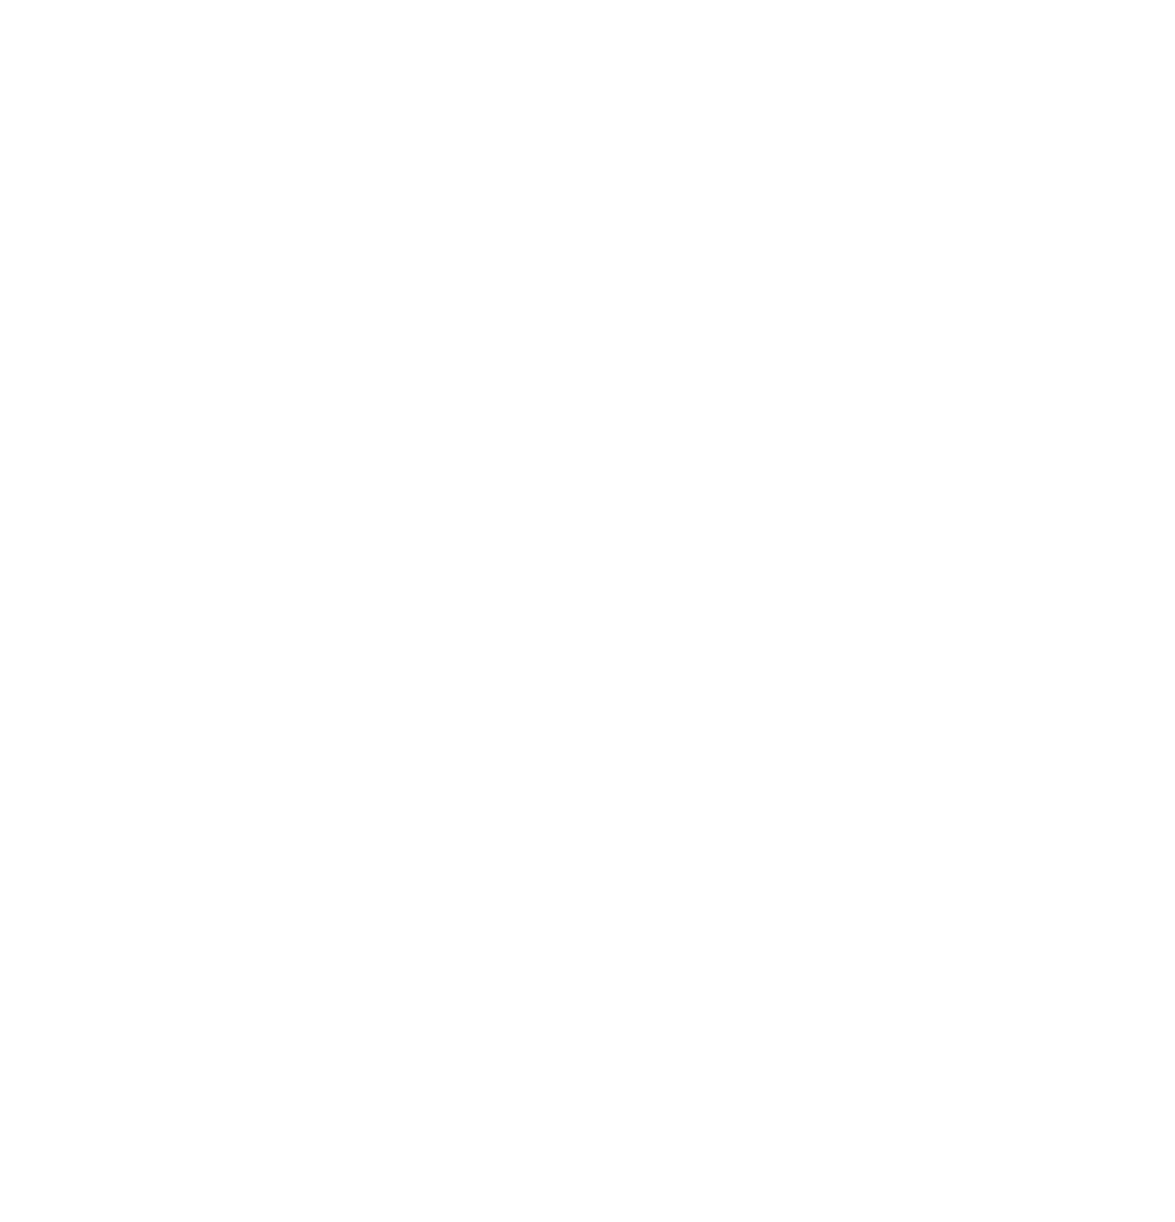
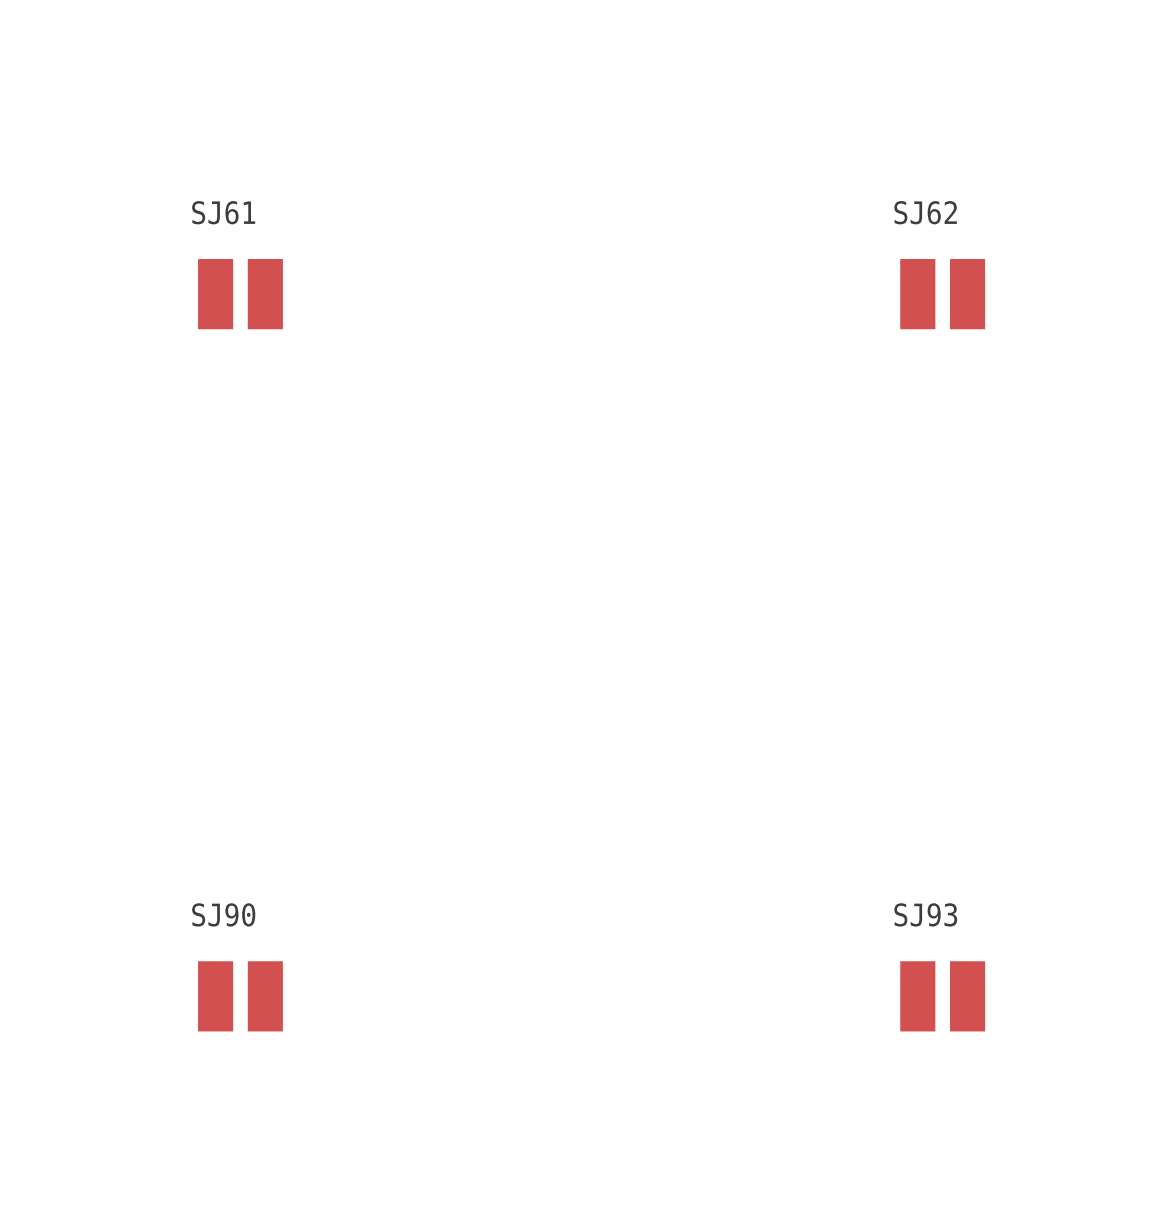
SJ61: none -> (240, 294)
SJ62: none -> (942, 294)
SJ90: none -> (240, 996)
SJ93: none -> (942, 996)

